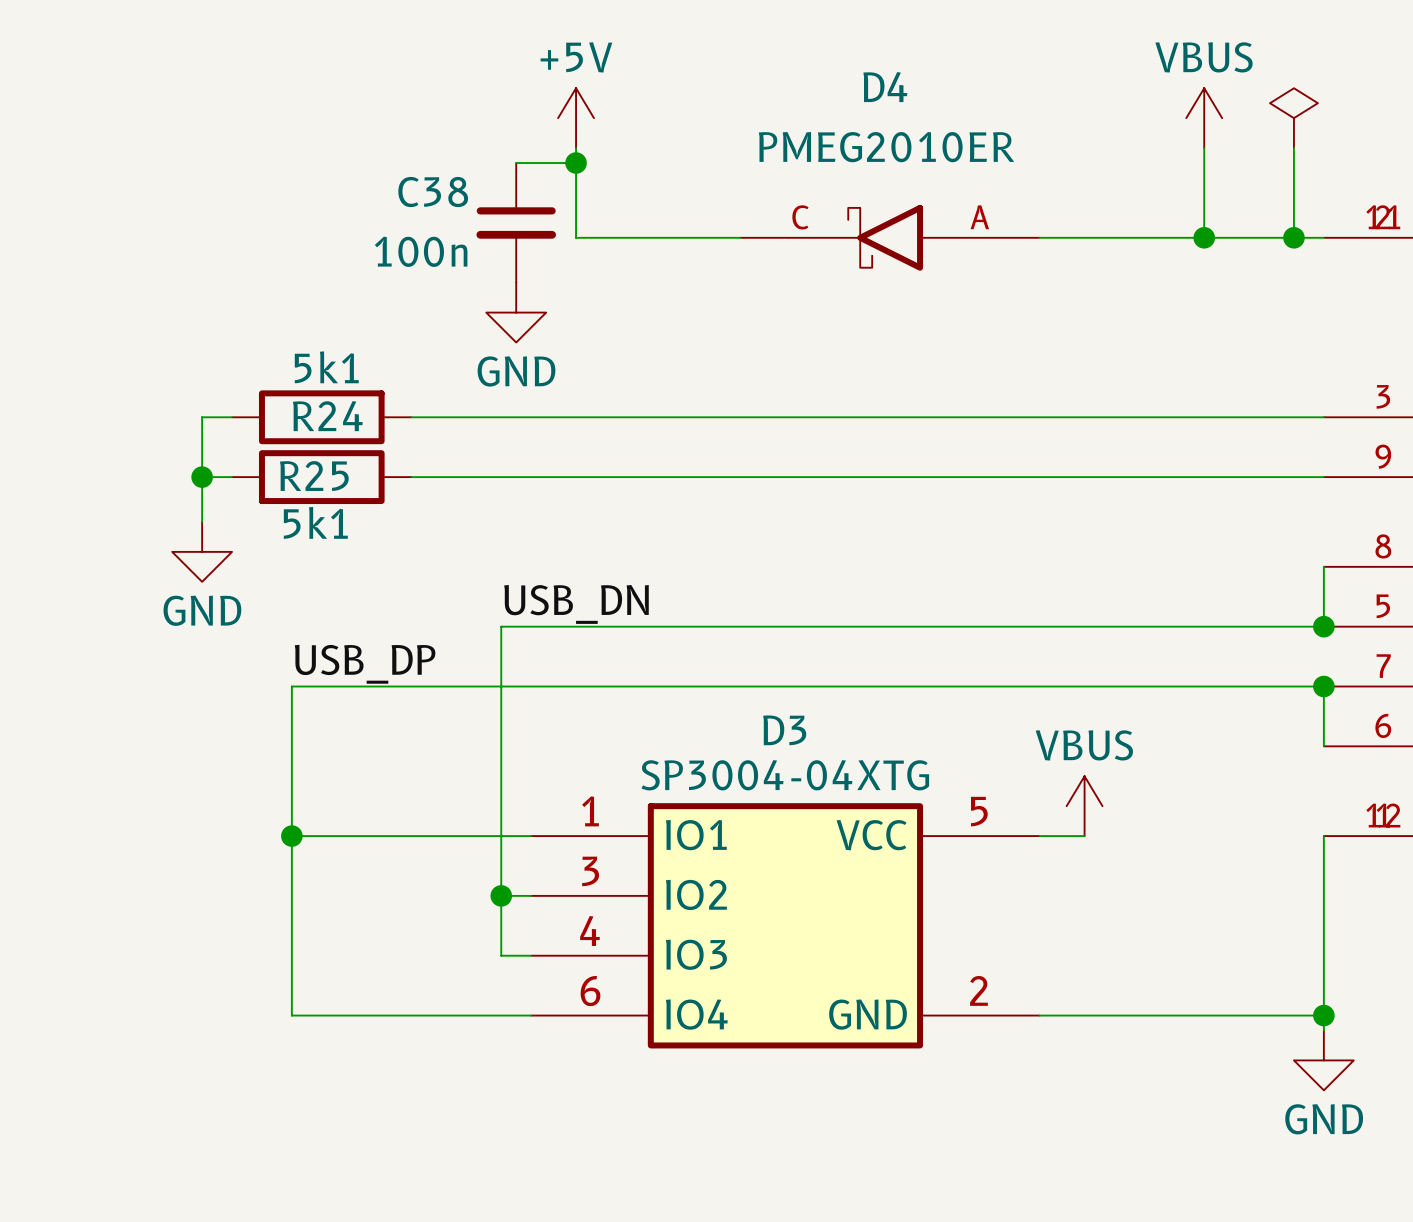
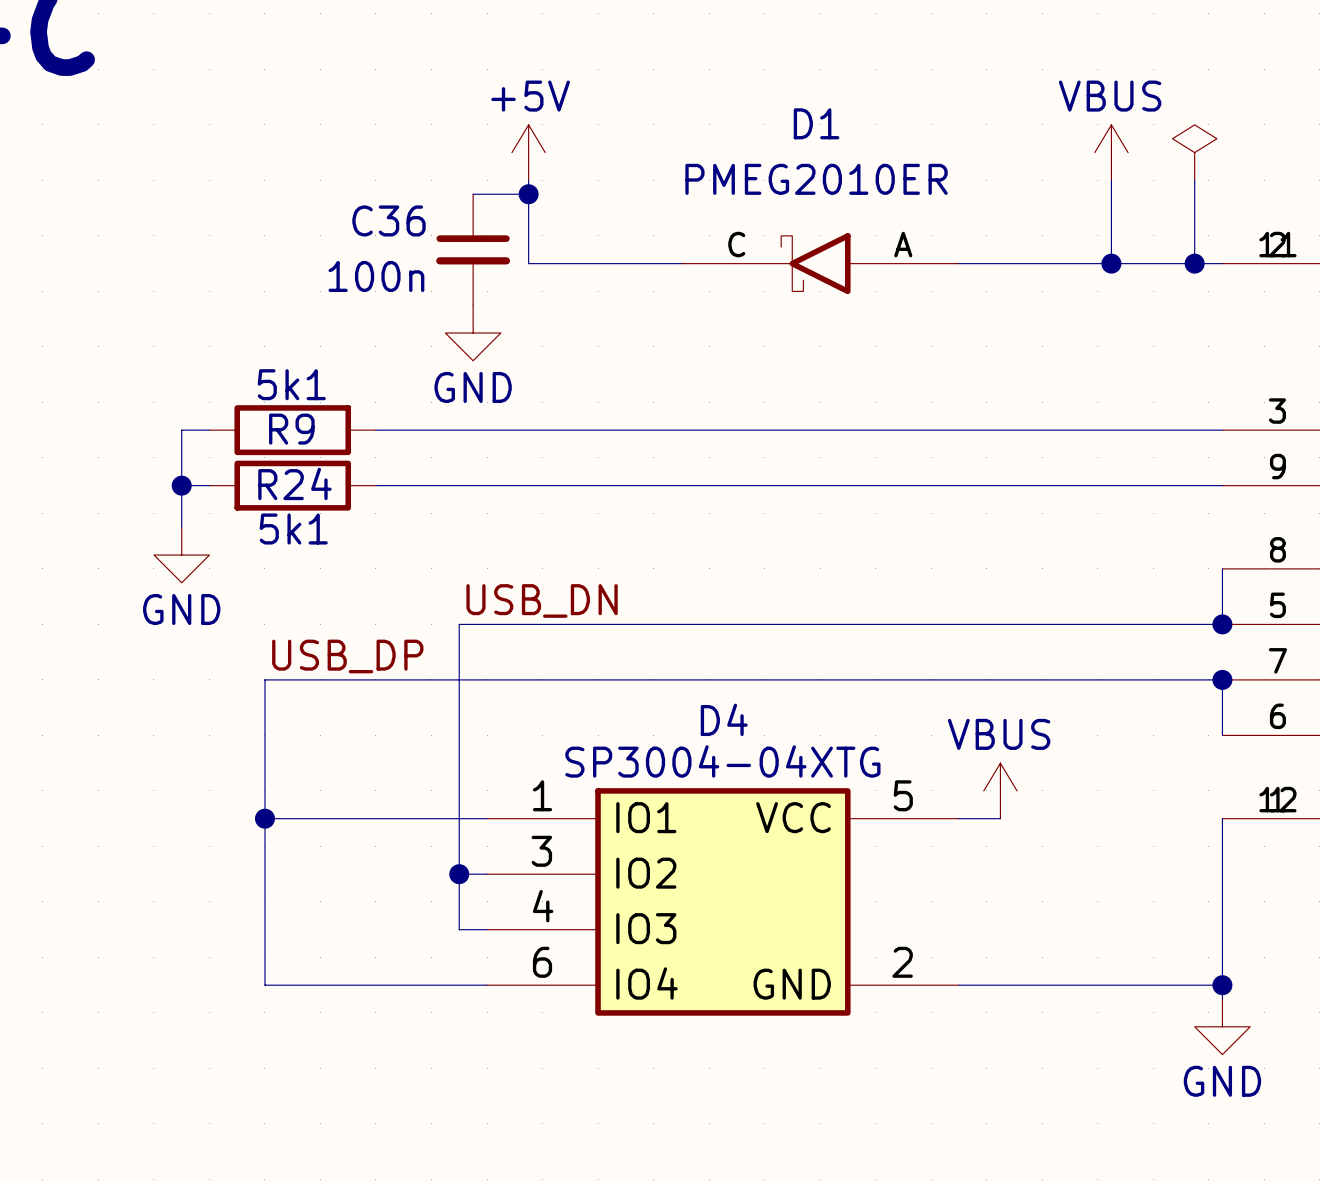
D4 name: D4 (885, 87) -> D1 (816, 123)
C38 name: C38 (433, 192) -> C36 (388, 220)
R24 name: R24 (327, 416) -> R9 (291, 429)
R25 name: R25 (314, 476) -> R24 (294, 483)
D3 name: D3 (784, 730) -> D4 (724, 719)

